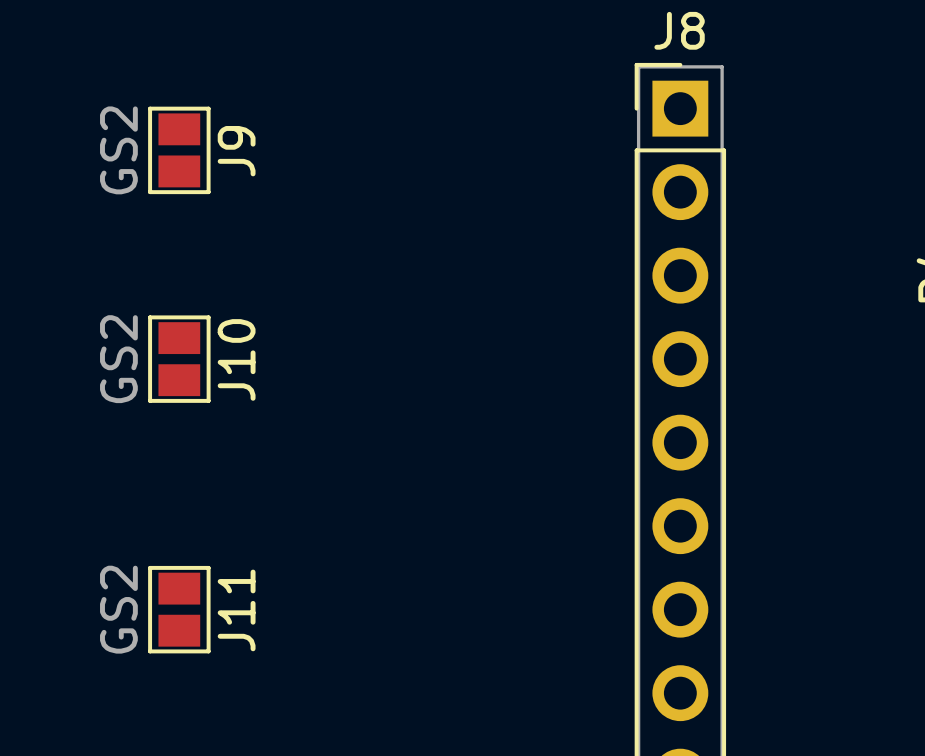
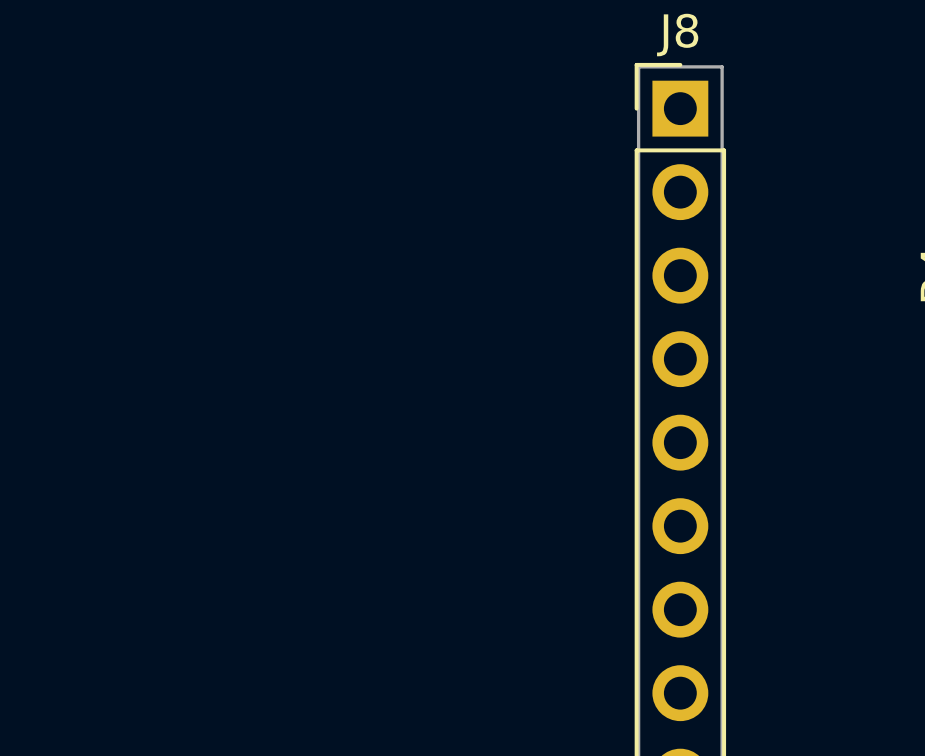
J9: GS2 (179, 150) -> none
J10: GS2 (179, 359) -> none
J11: GS2 (179, 609) -> none

